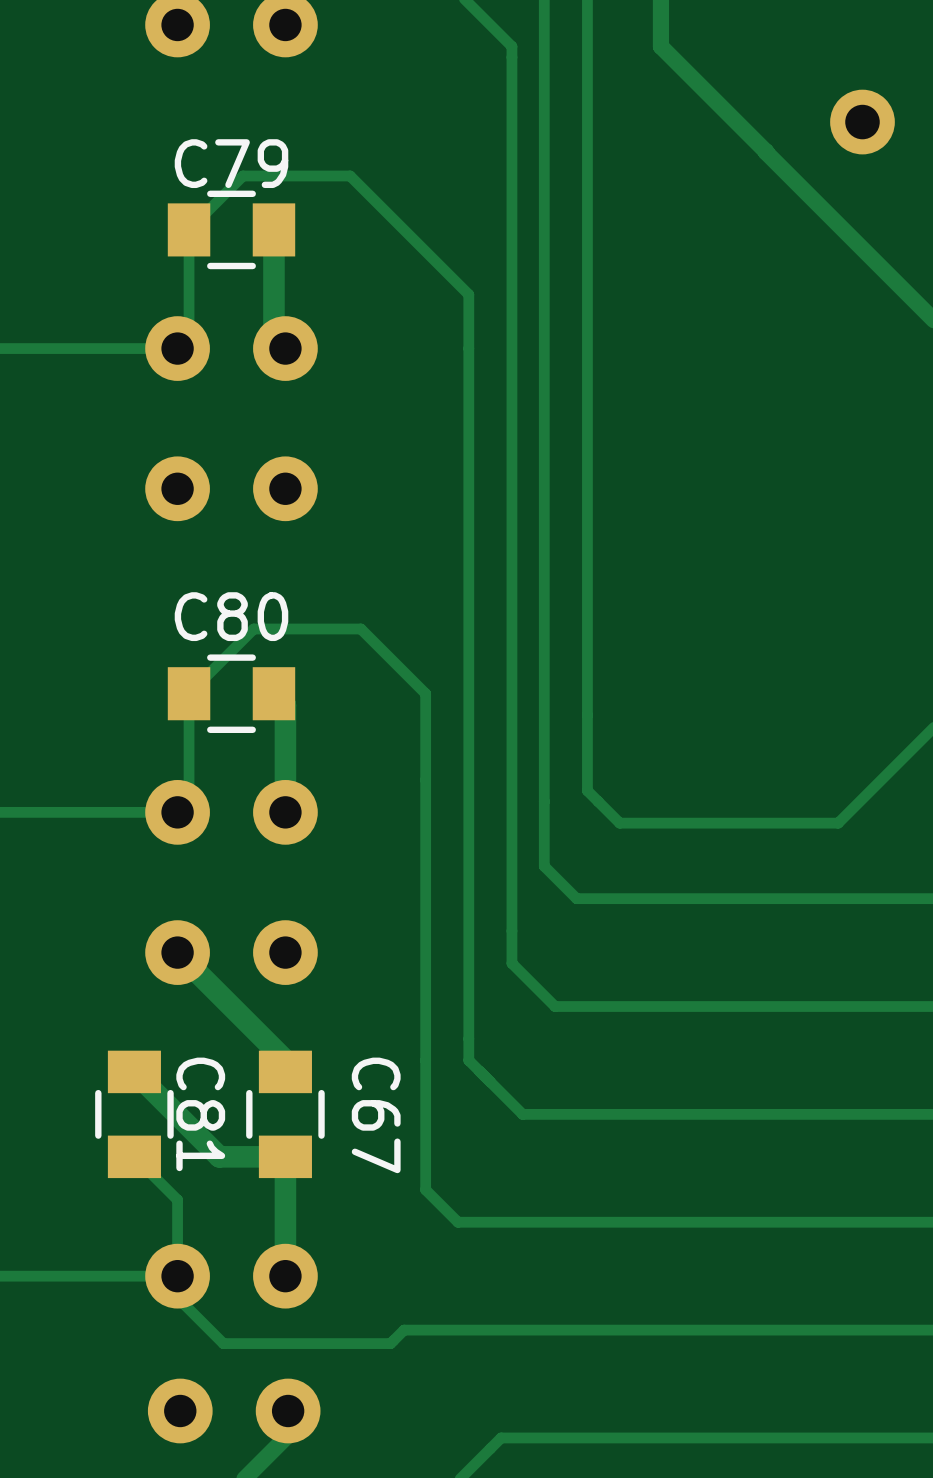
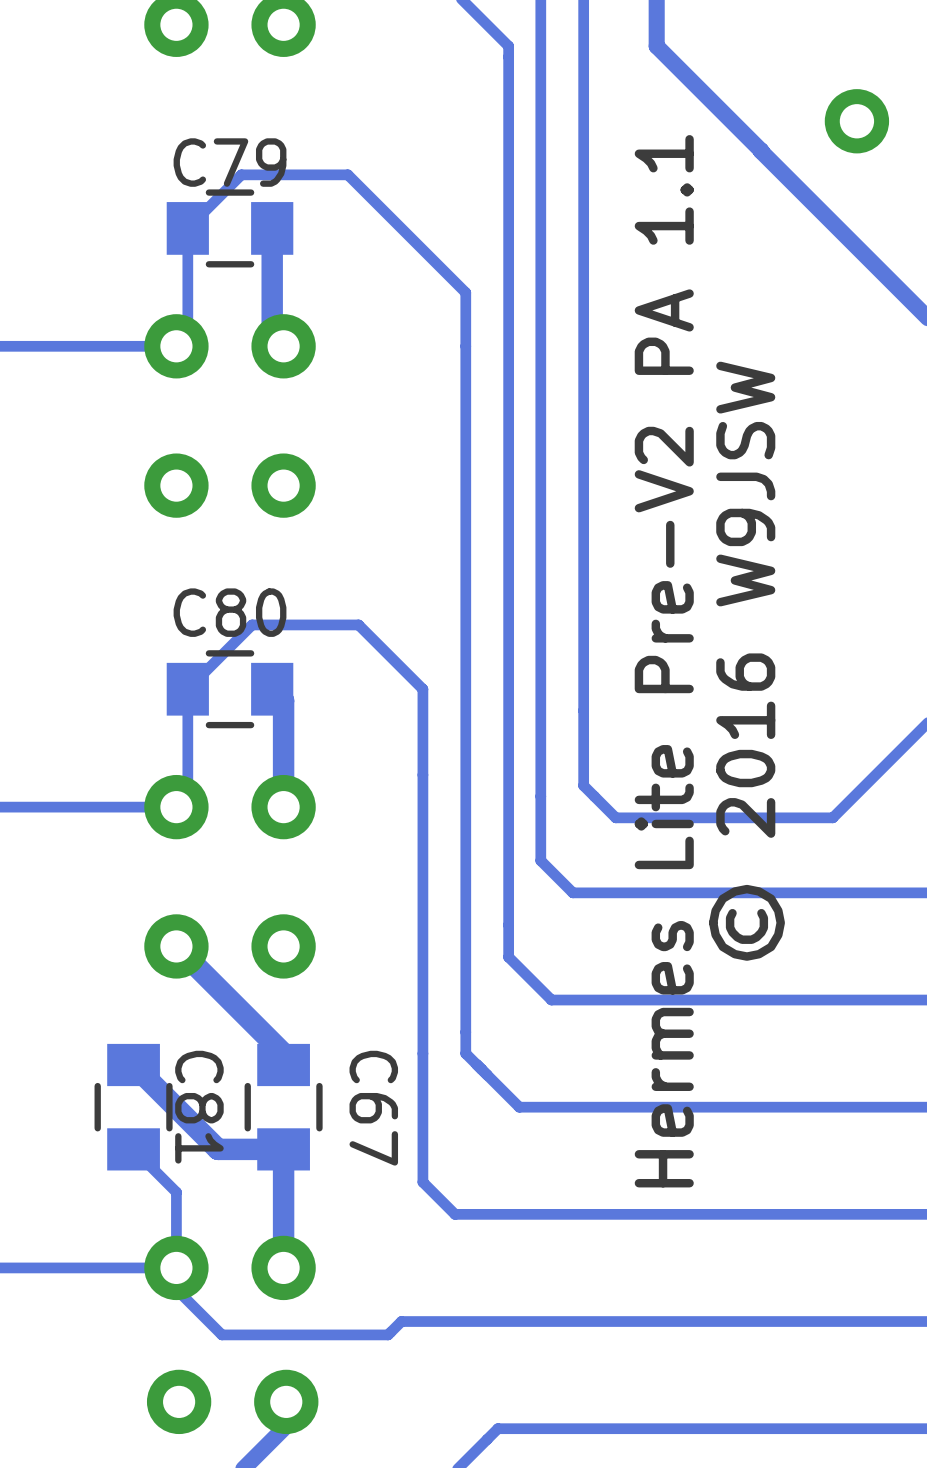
text: none -> Hermes Lite Pre-V2 PA 1.1 (664, 661)
text: none -> © 2016 W9JSW (746, 661)

